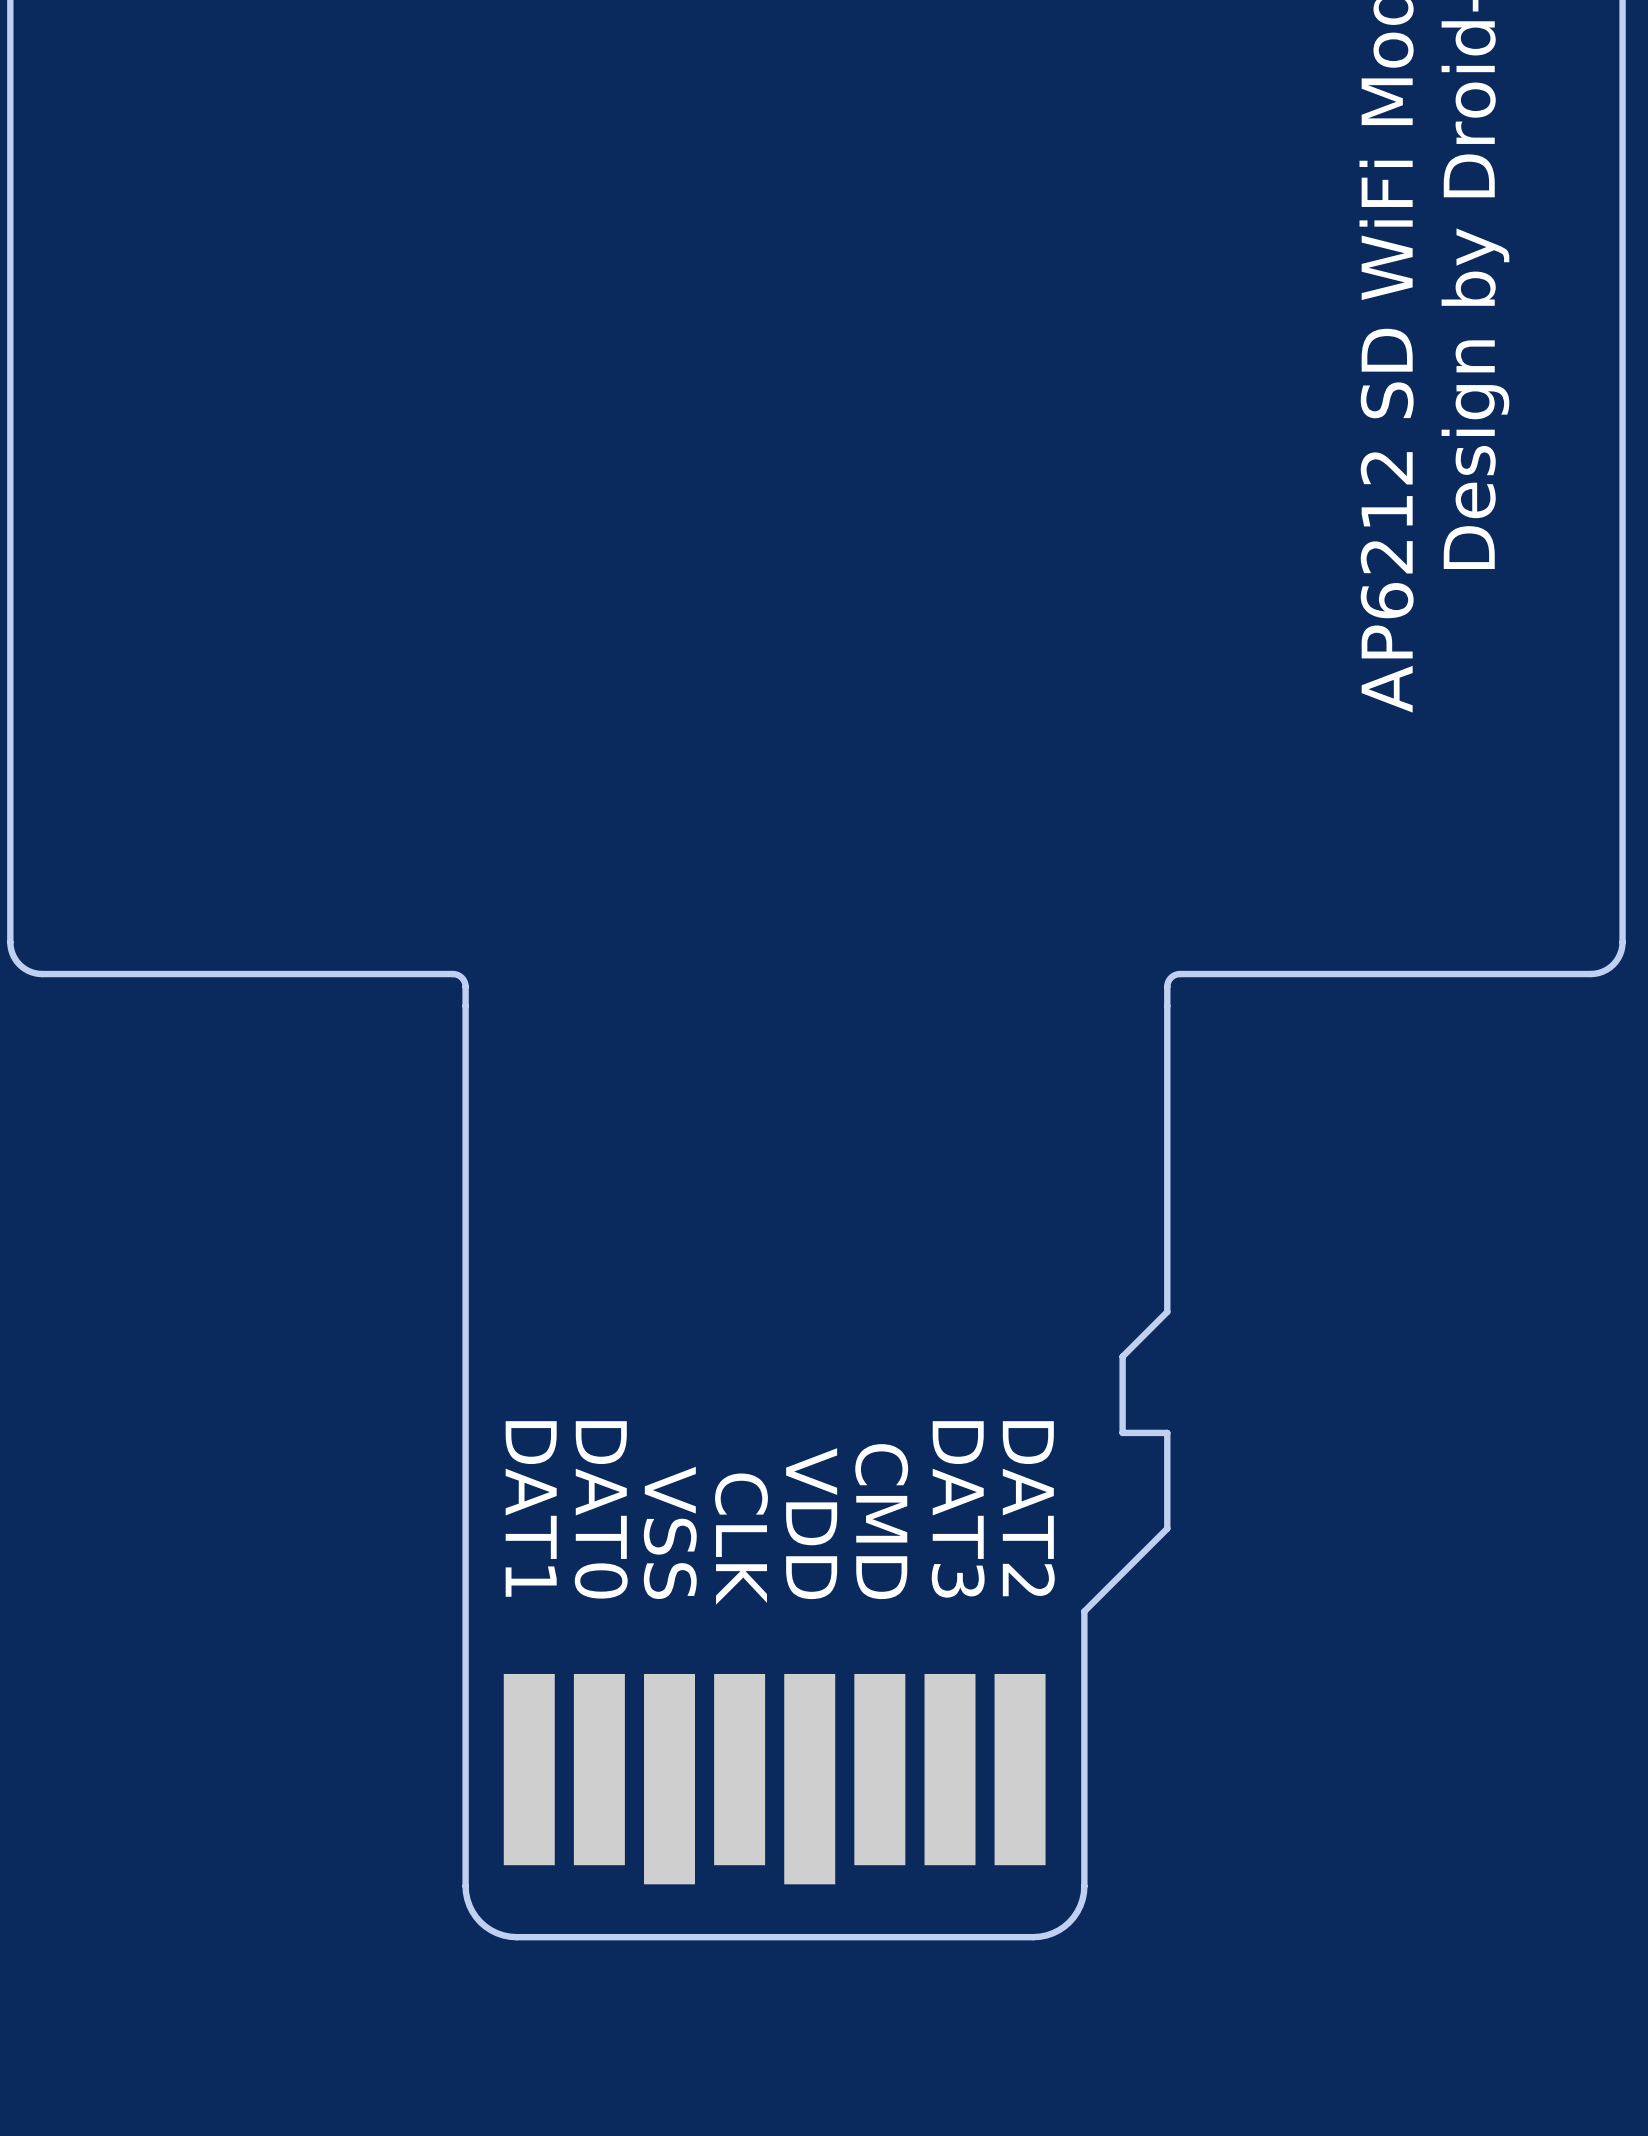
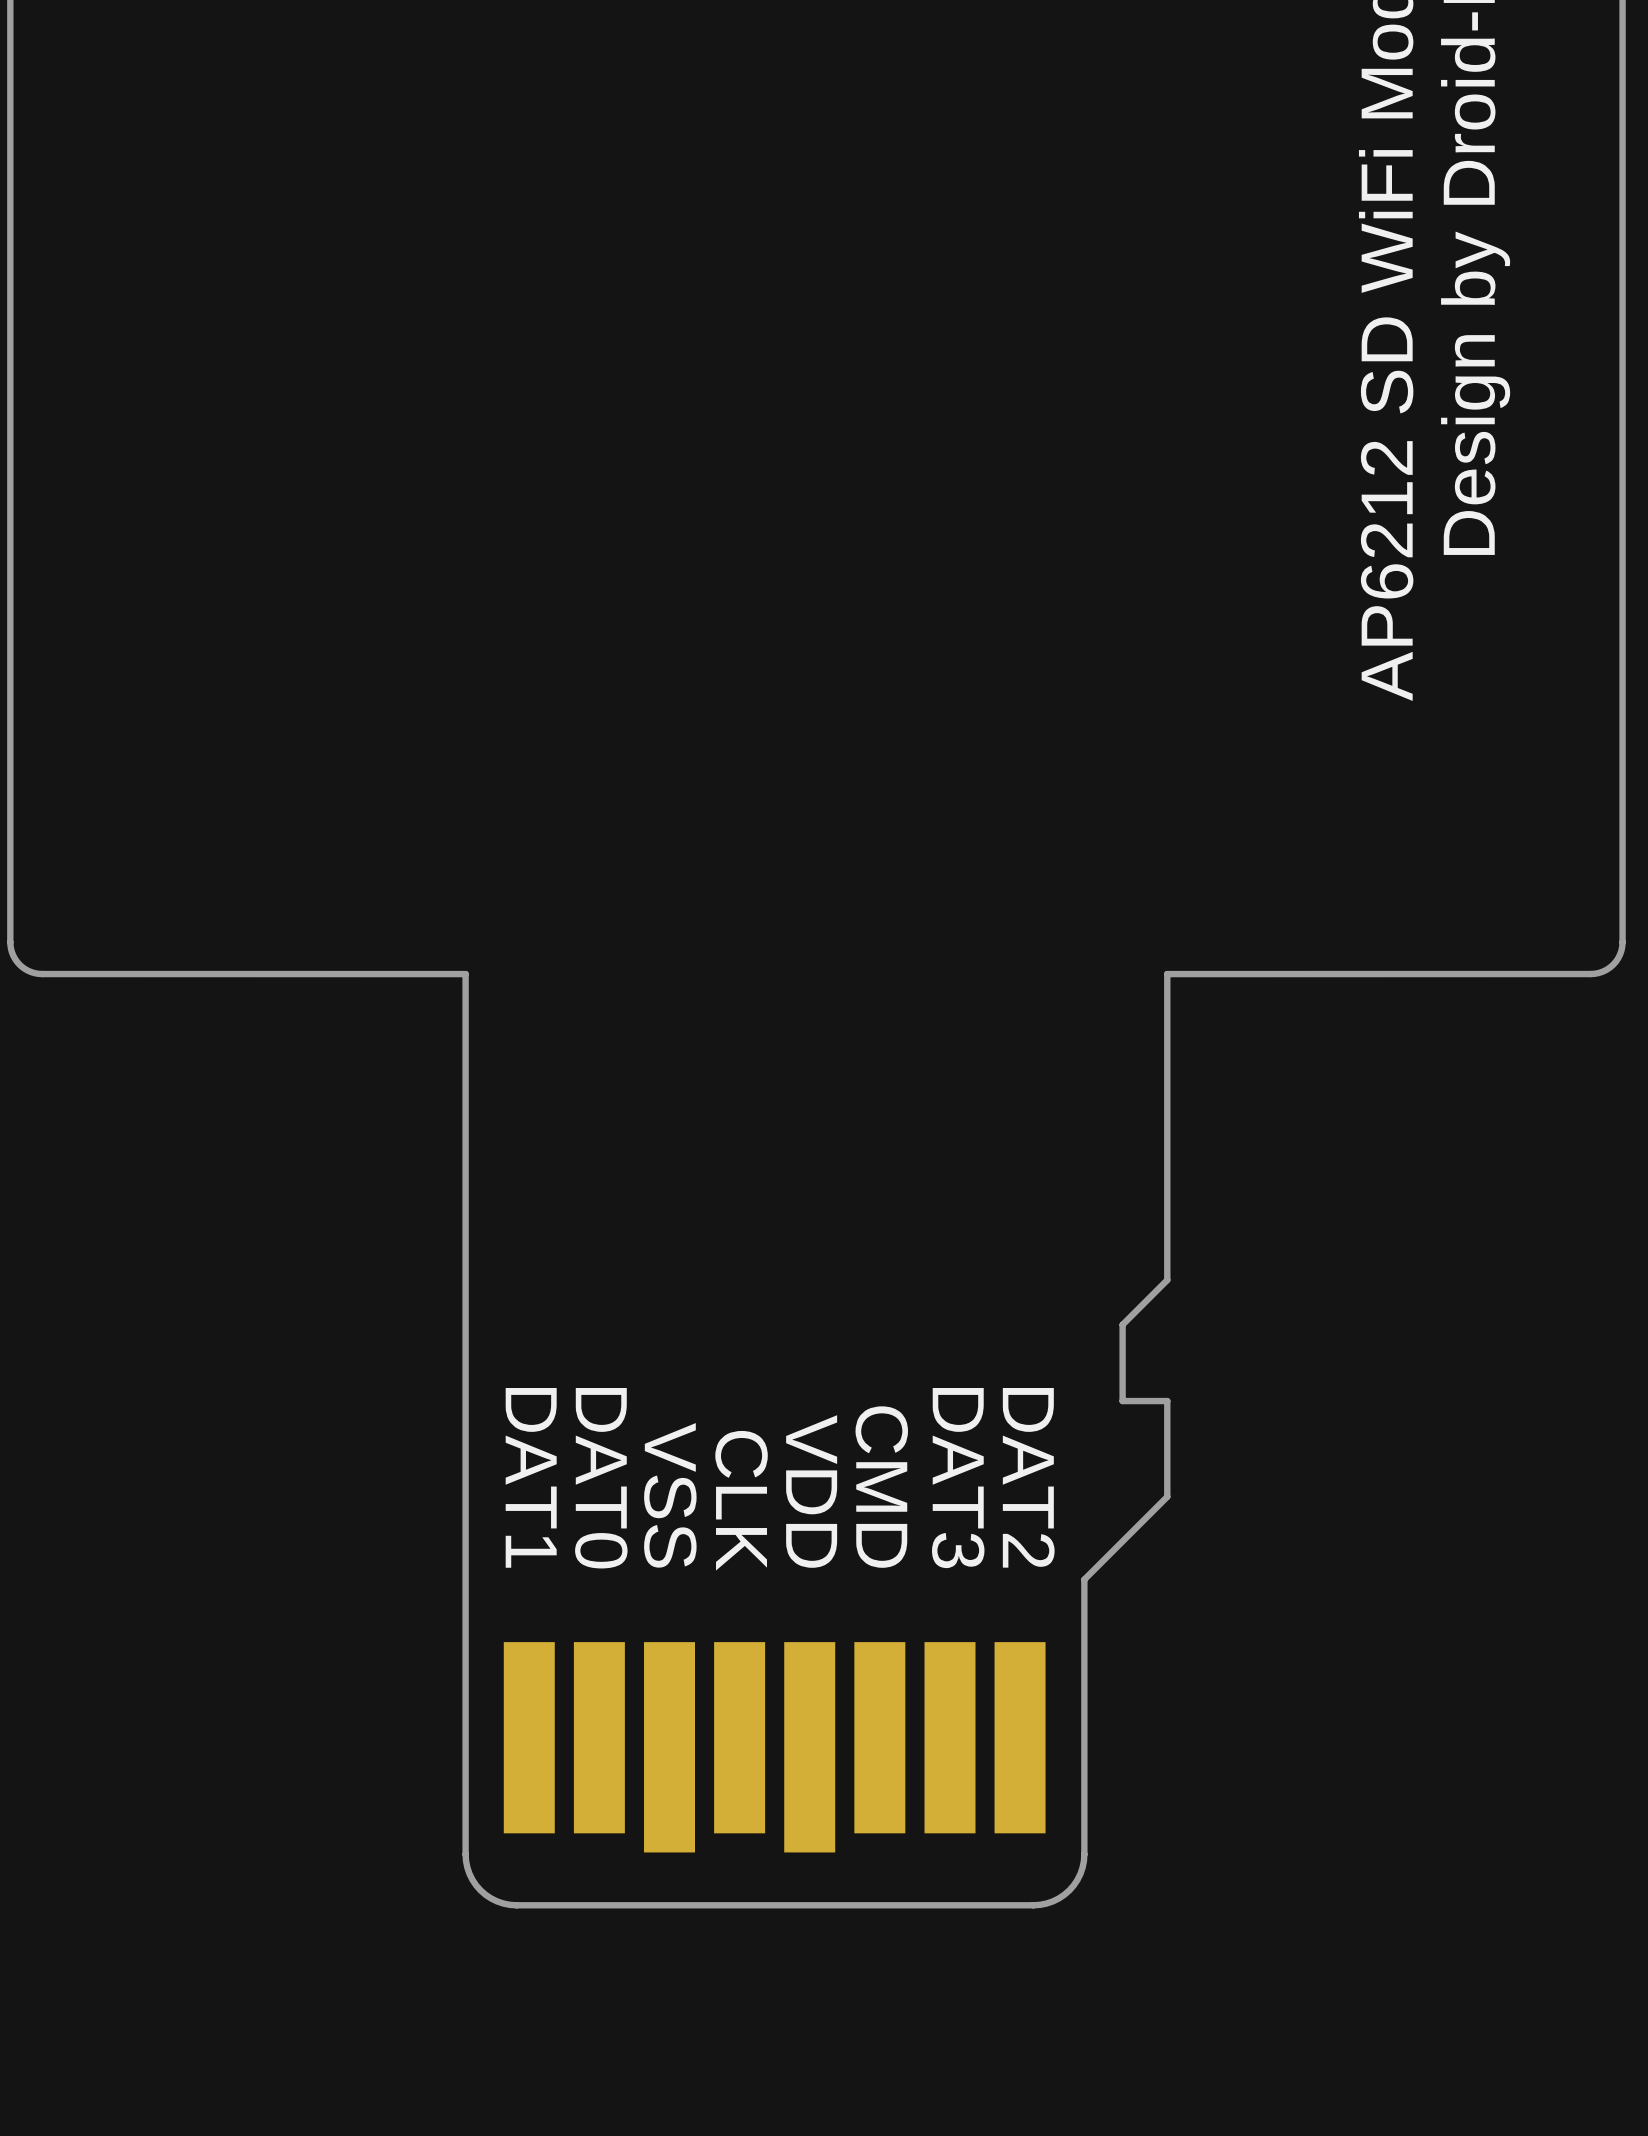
board edge: (42, 974) (454, 974) (460, 976) (464, 981) (465, 1005) -> (42, 974) (465, 974)
board edge: (1590, 974) (1178, 974) (1172, 976) (1168, 981) (1167, 1005) -> (1590, 974) (1167, 974)
part position: (816, 1471) -> (816, 1439)

